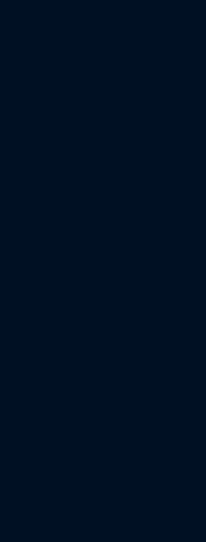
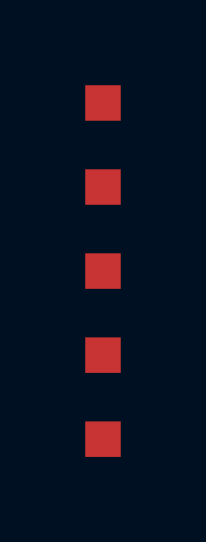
part: none -> (102, 102)
part: none -> (102, 187)
part: none -> (102, 271)
part: none -> (102, 355)
part: none -> (102, 439)

